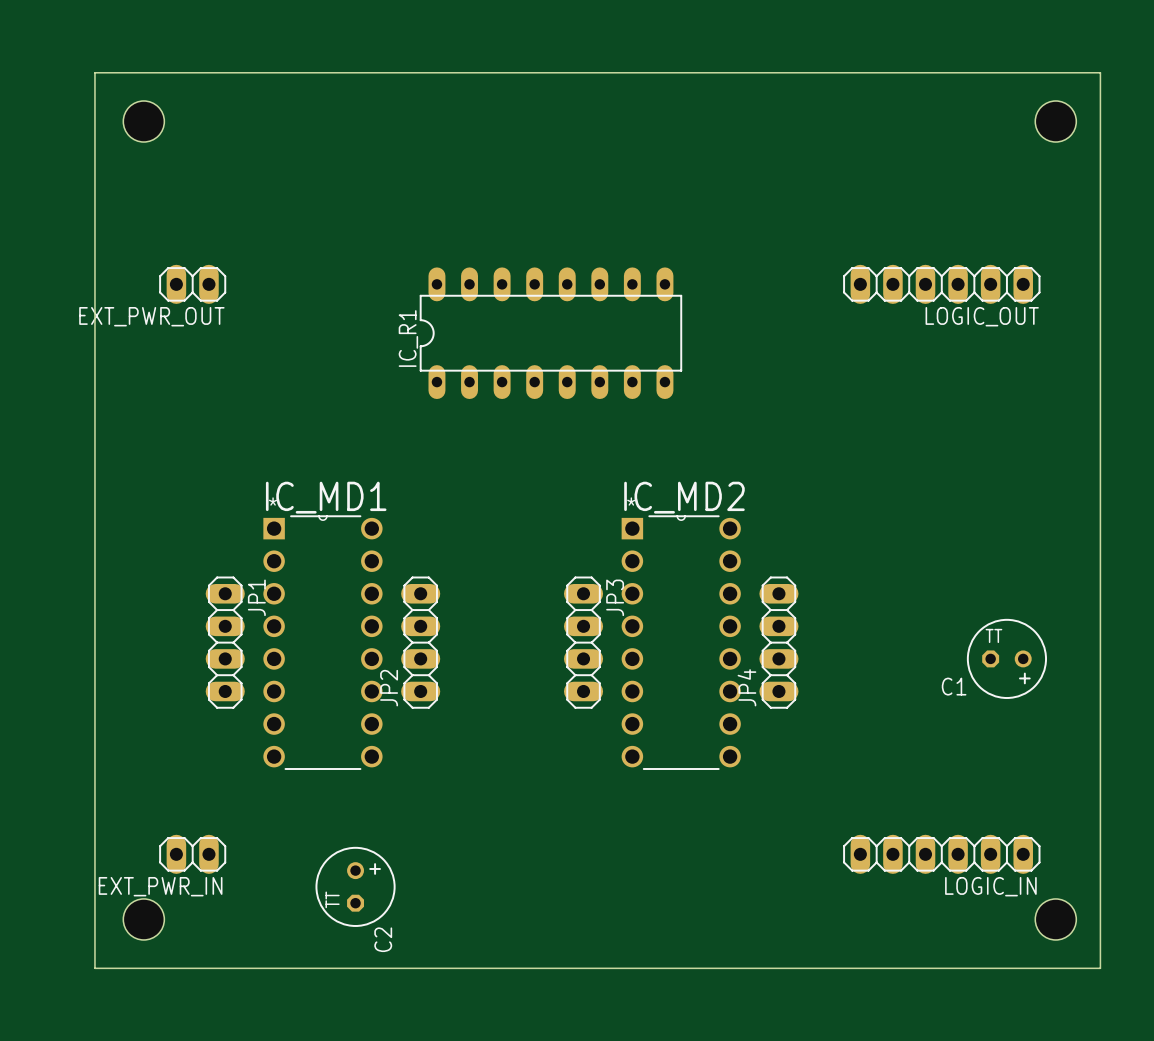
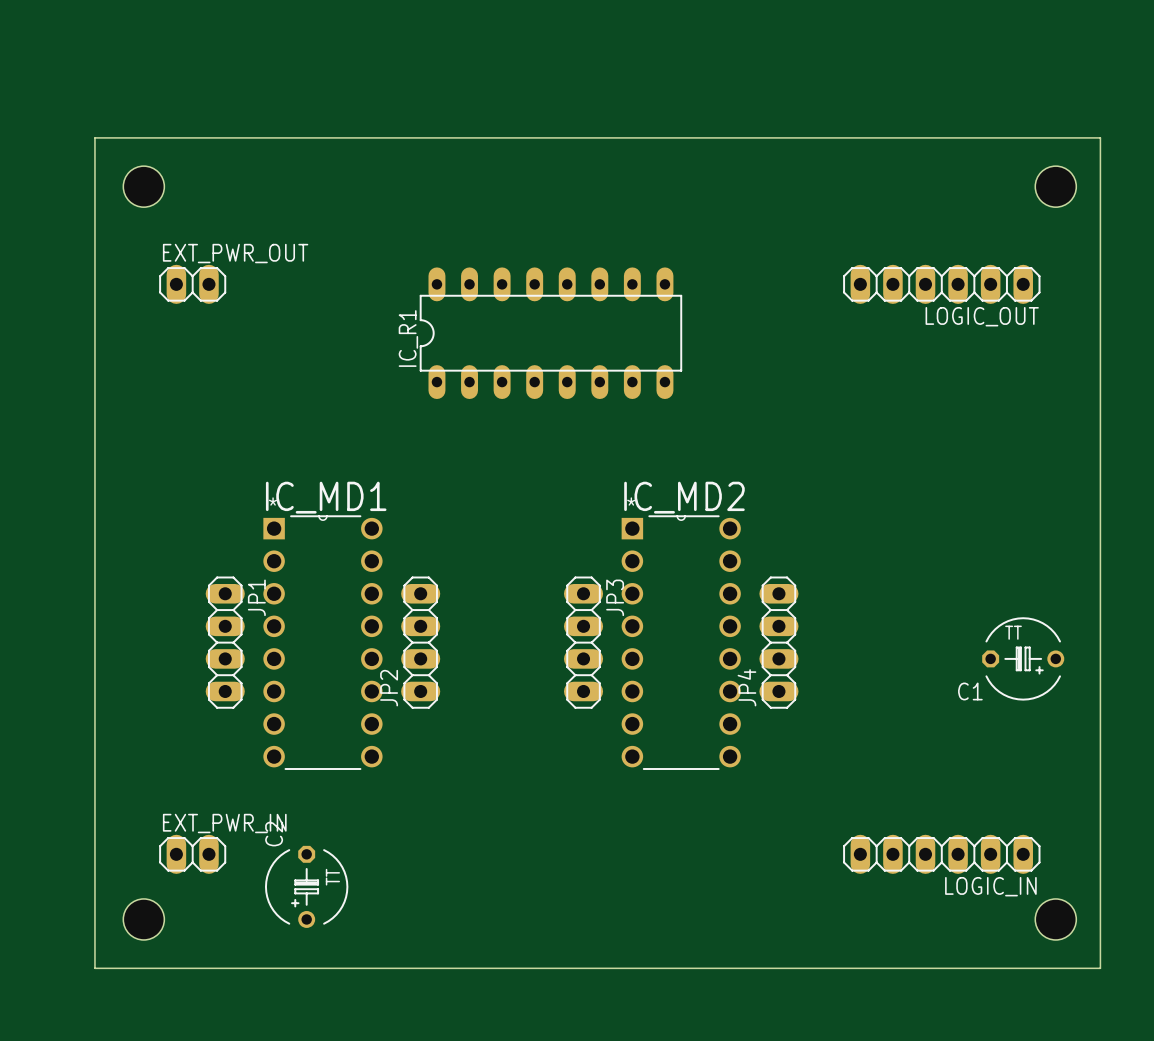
hole position: (143, 121) -> (143, 186)
hole position: (1055, 121) -> (1055, 186)
board edge: (94, 137) (94, 72) (1100, 72) (1100, 137) -> (94, 137) (1100, 137)
EXT_PWR_OUT name position: EXT_PWR_OUT (151, 316) -> EXT_PWR_OUT (235, 253)
C1 footprint: [966, 618, 1047, 699] -> [982, 617, 1065, 701]
C2 footprint: [315, 846, 396, 927] -> [264, 845, 349, 928]
EXT_PWR_IN name position: EXT_PWR_IN (160, 886) -> EXT_PWR_IN (224, 823)
C2 name position: C2 (383, 939) -> C2 (274, 834)

